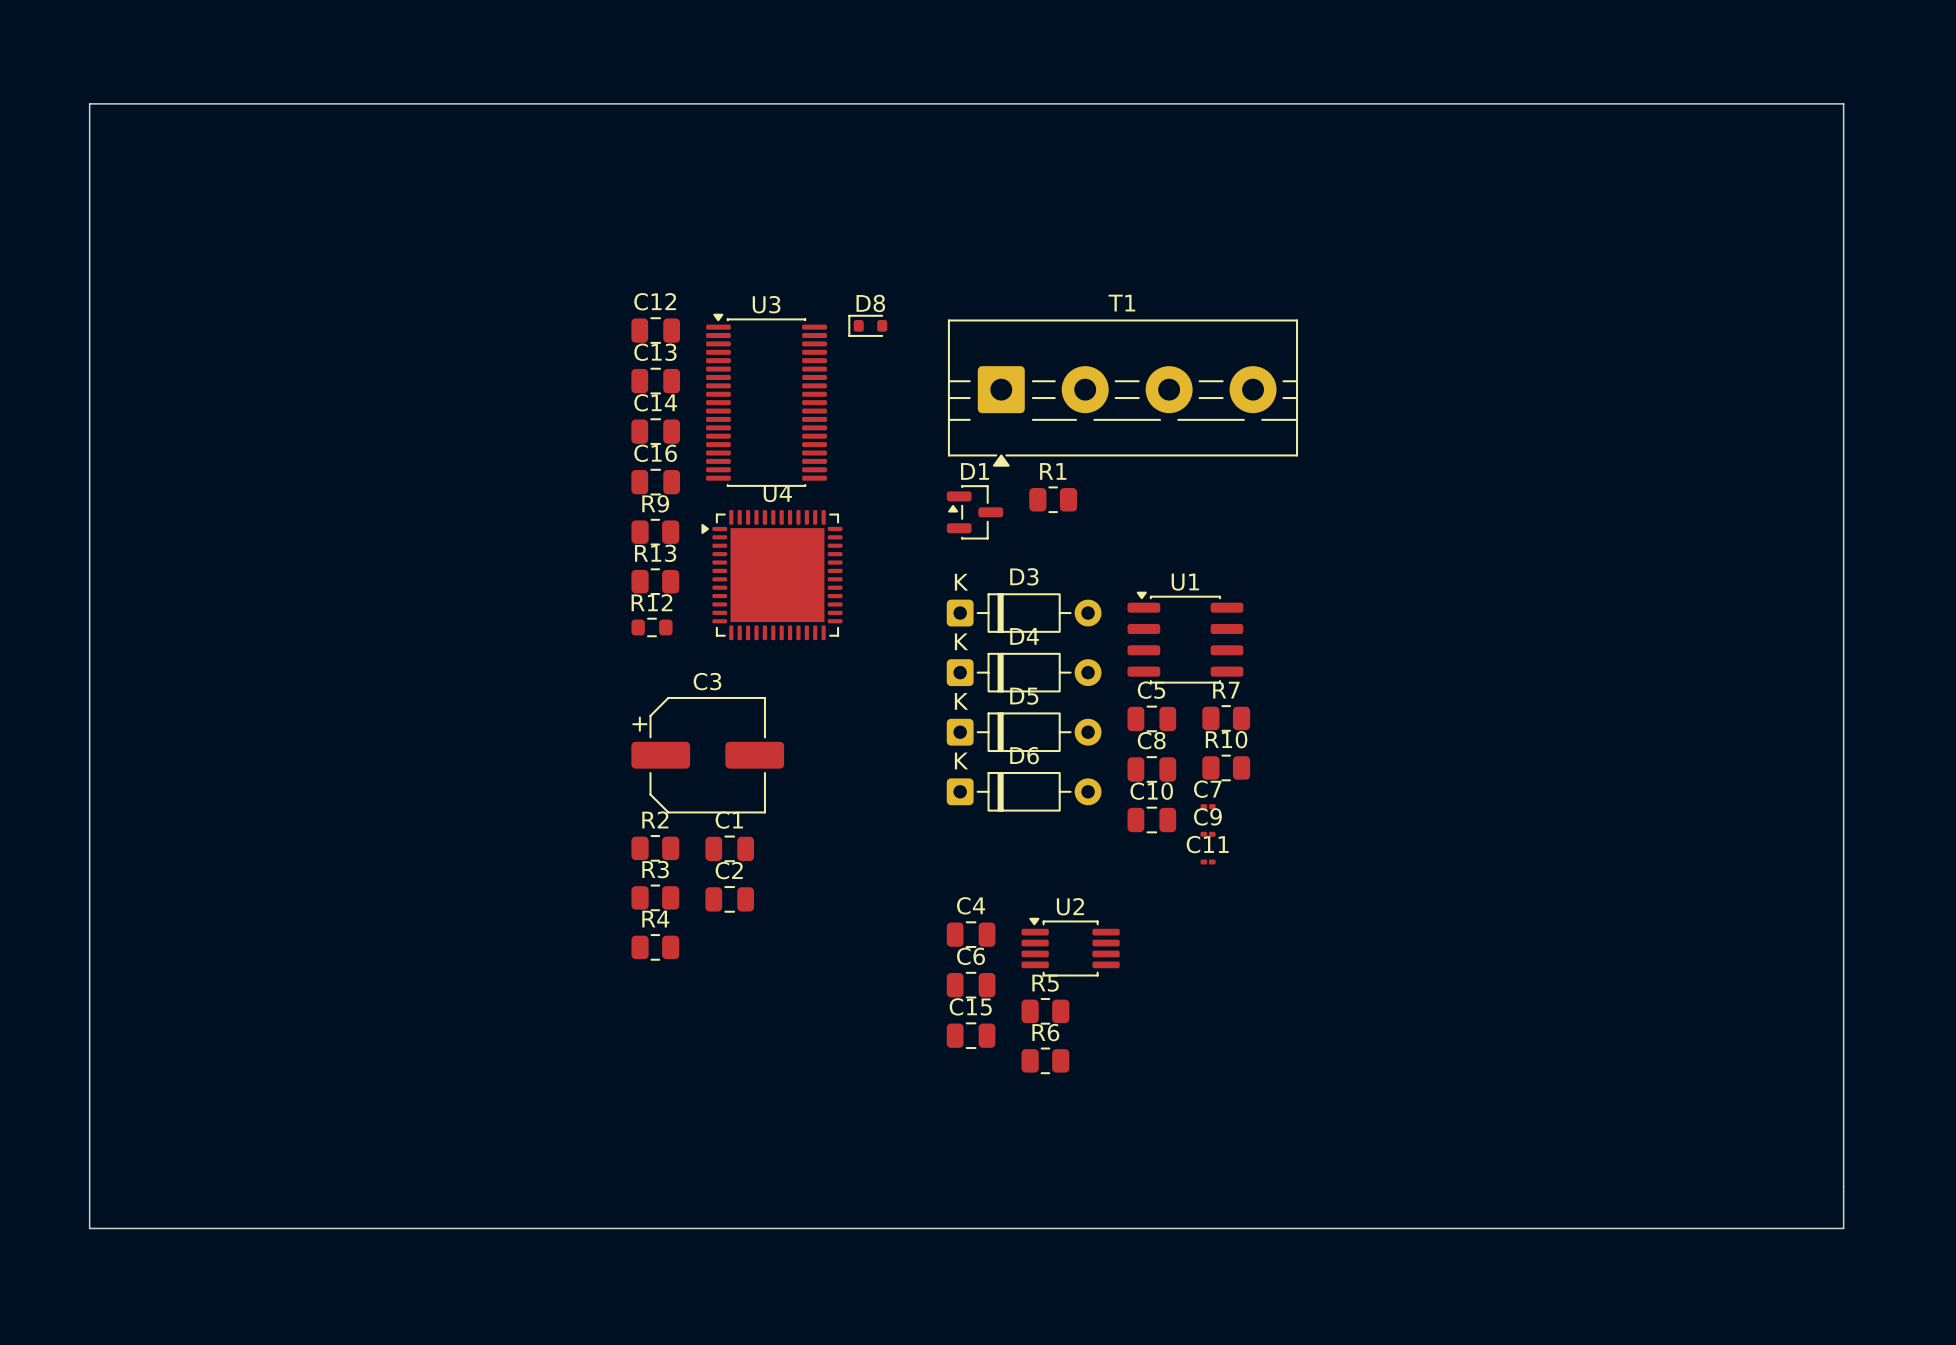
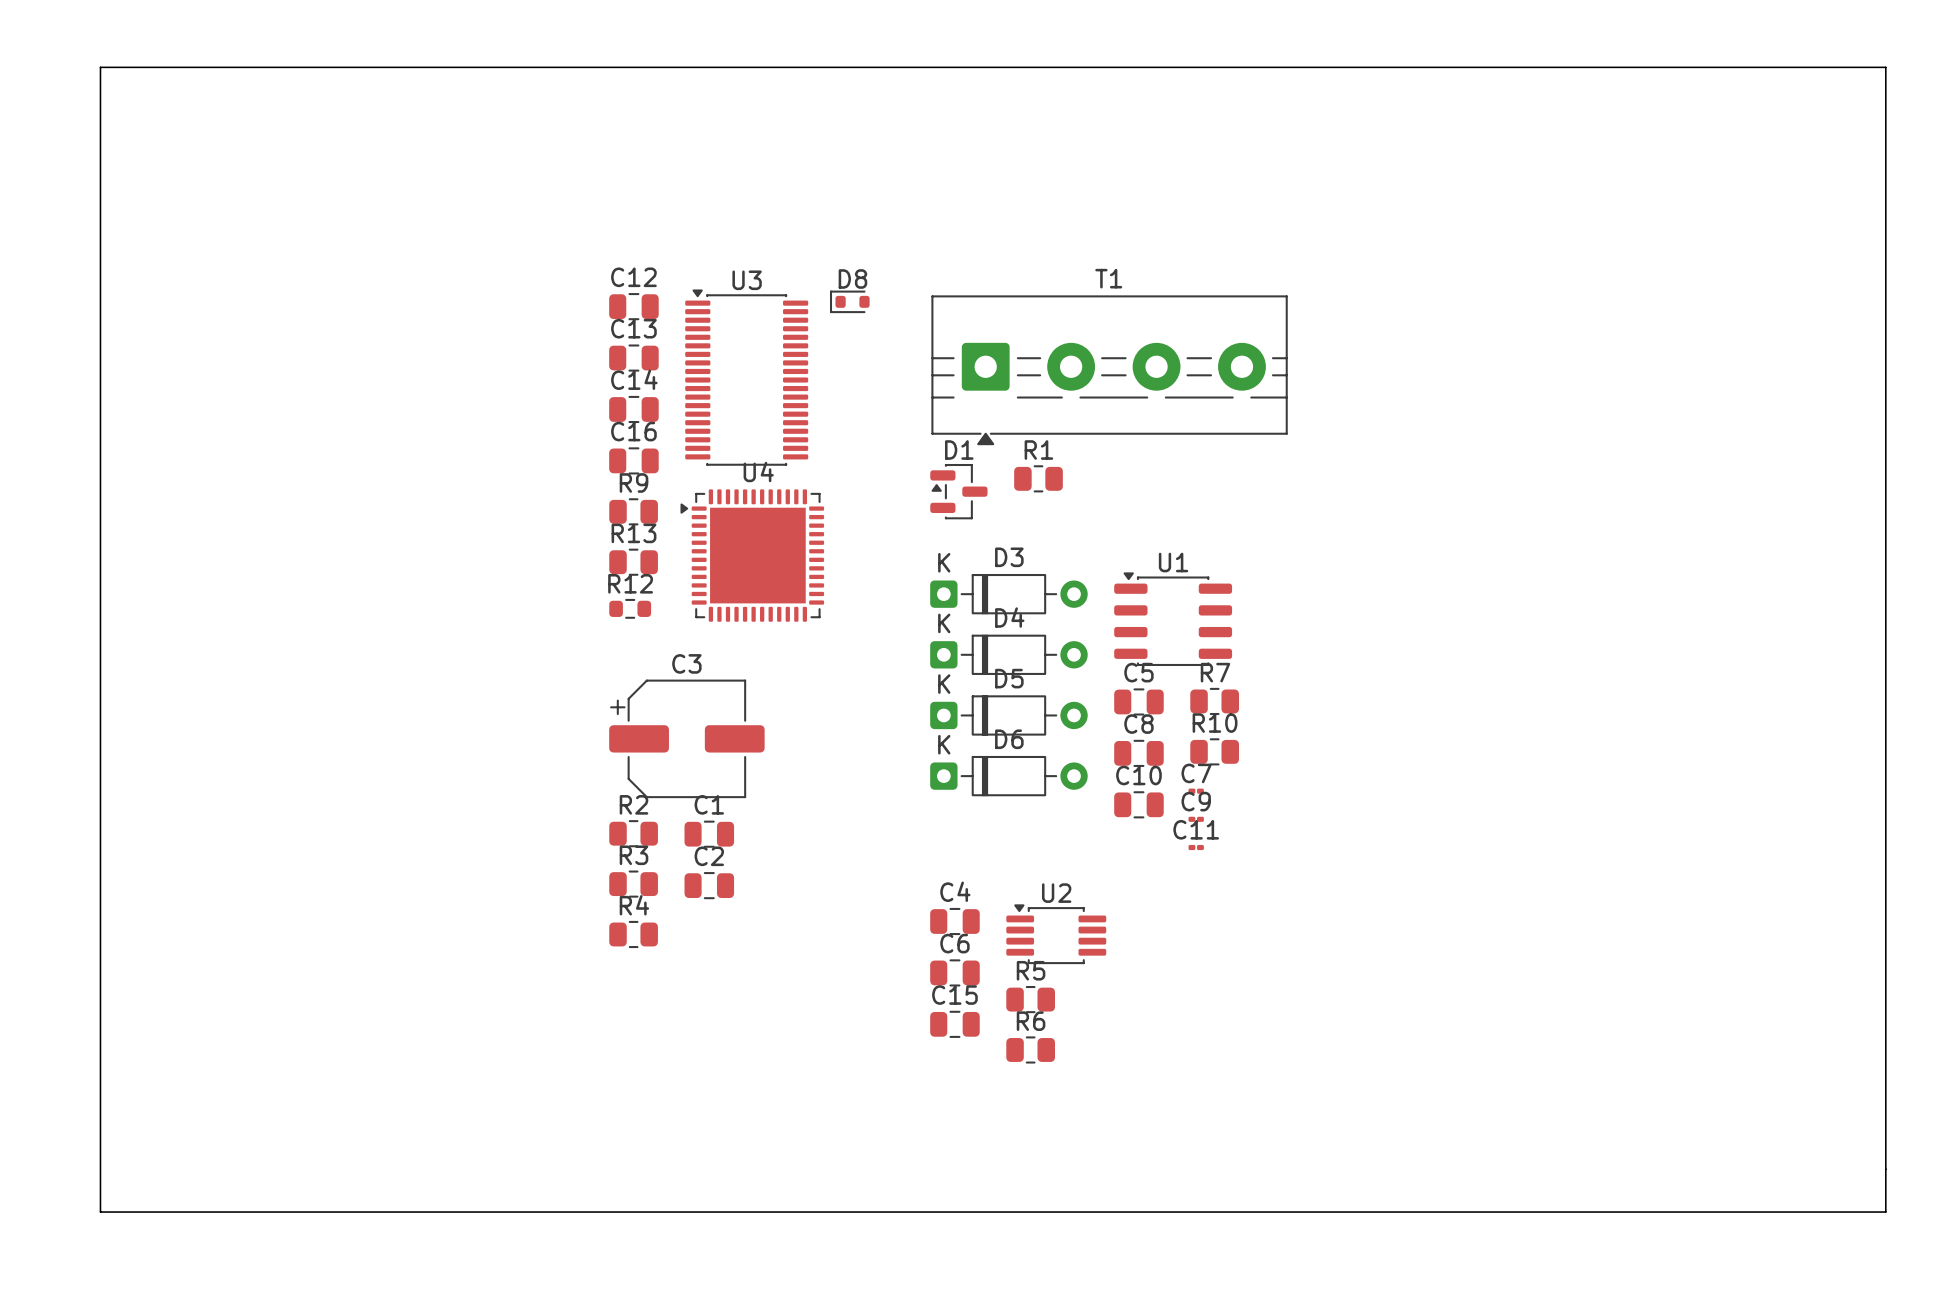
board edge: (89, 103) (89, 1228) (1843, 1228) (1843, 103) (89, 103) -> (100, 67) (100, 1212) (1885, 1212) (1885, 67) (100, 67)

